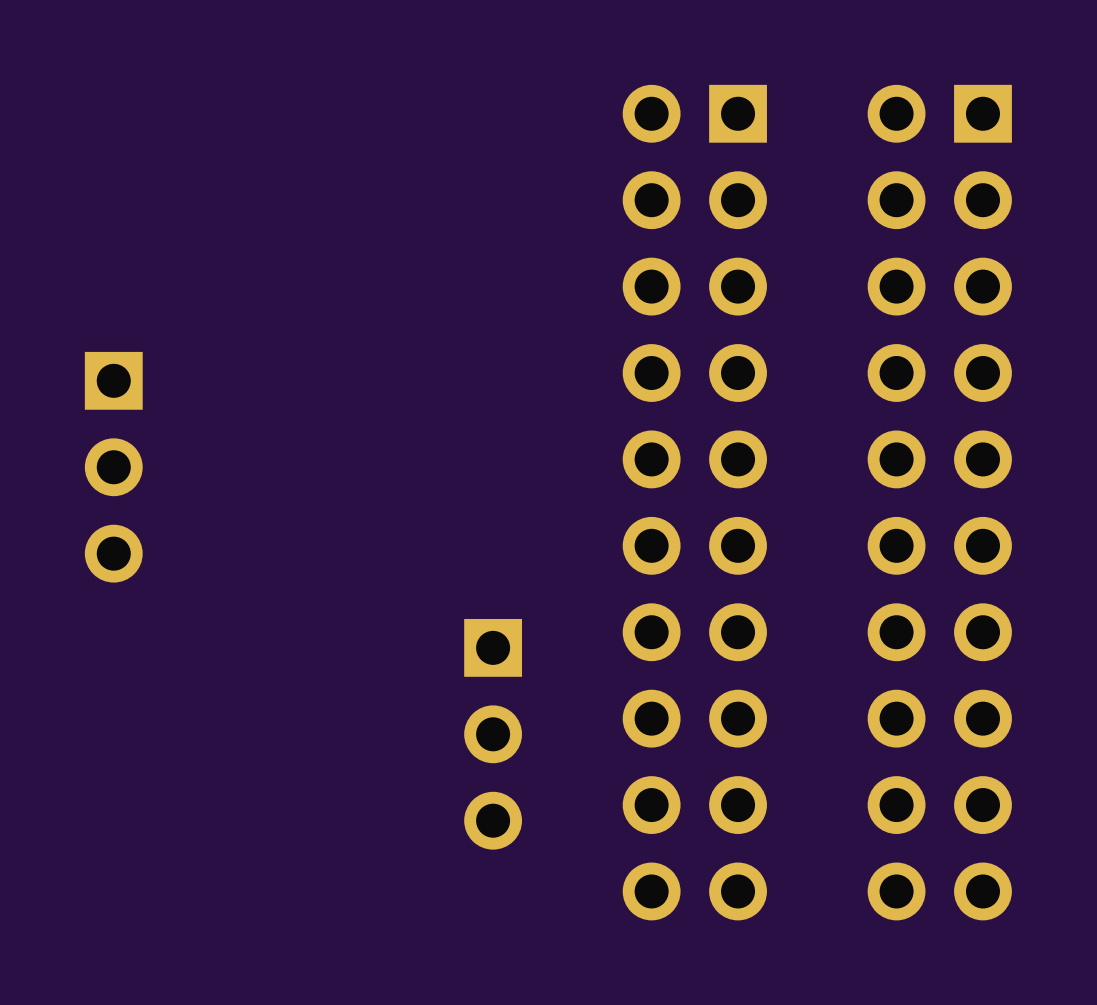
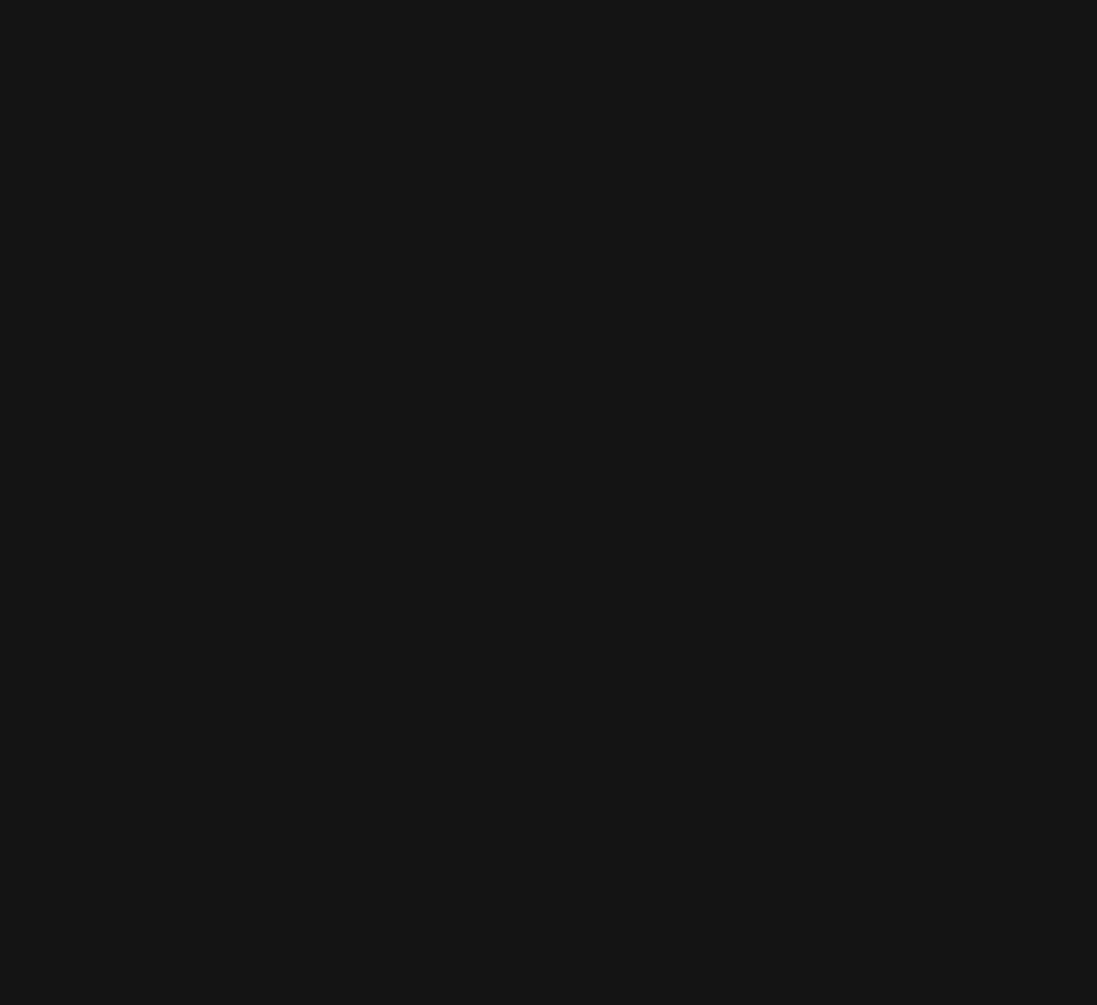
part: (113, 467) -> none
part: (694, 502) -> none
part: (939, 502) -> none
part: (493, 734) -> none

